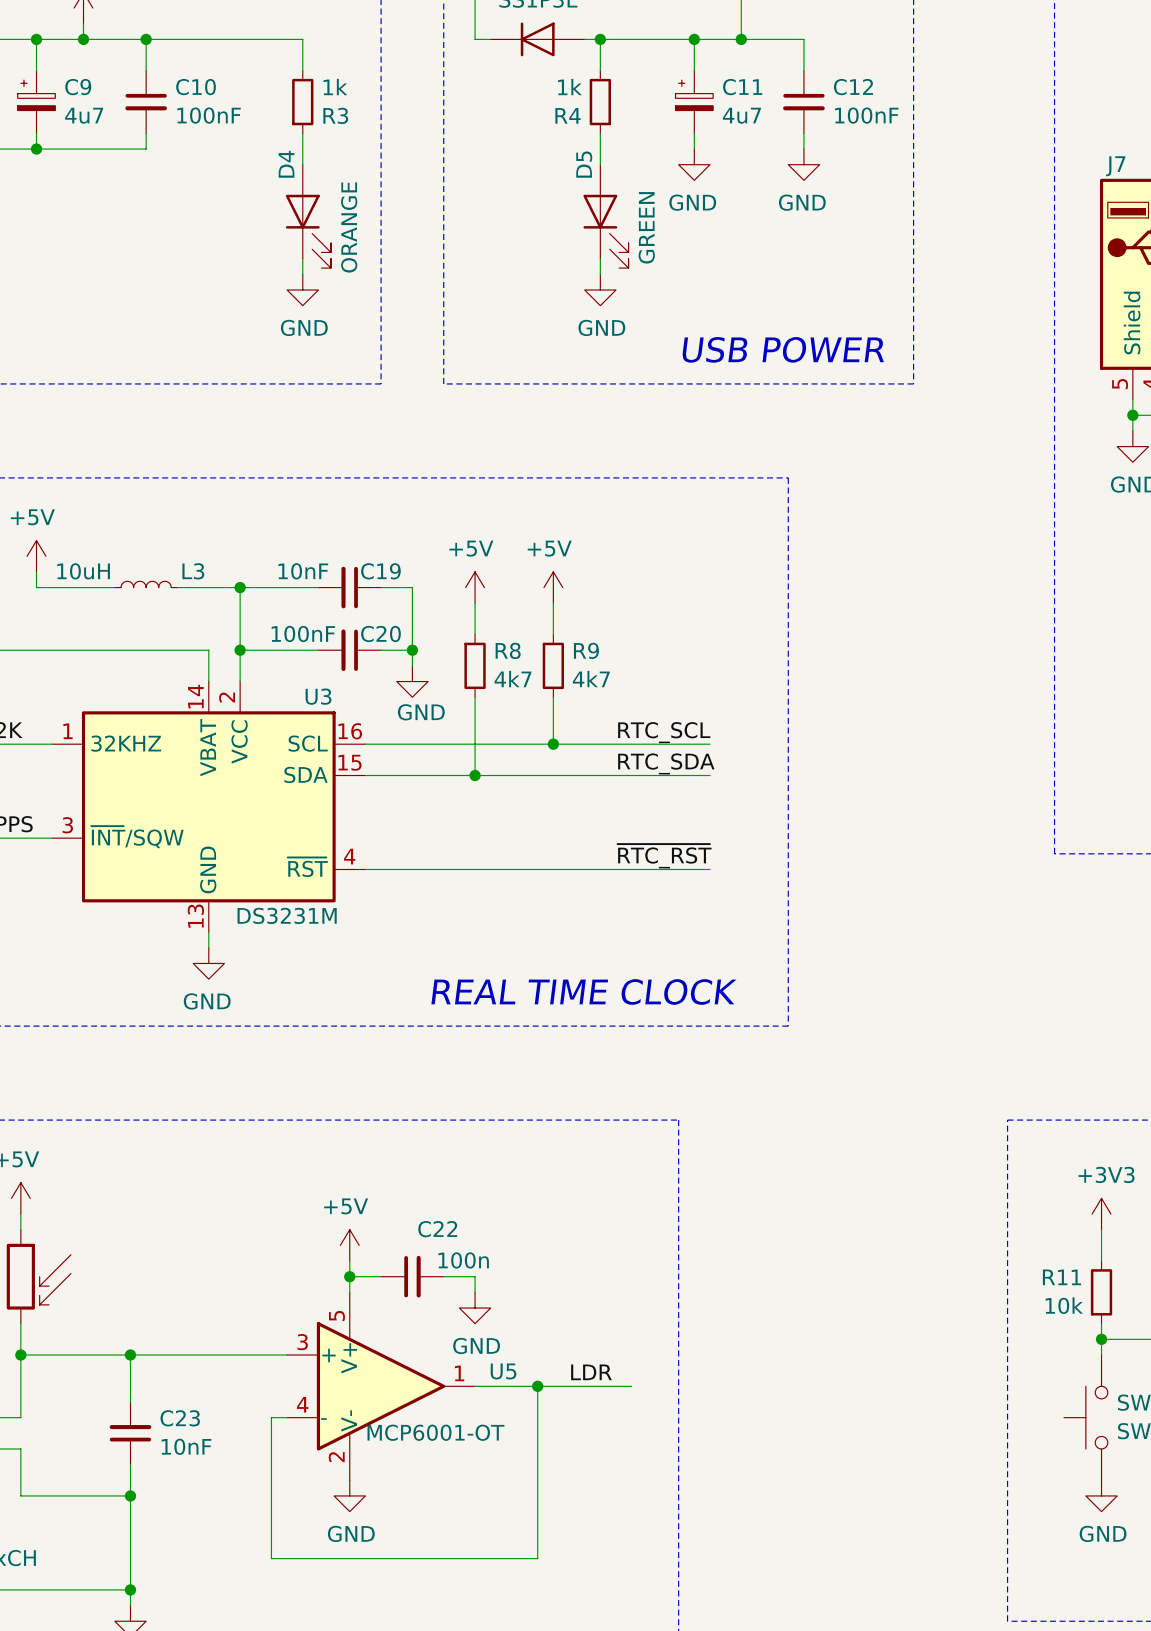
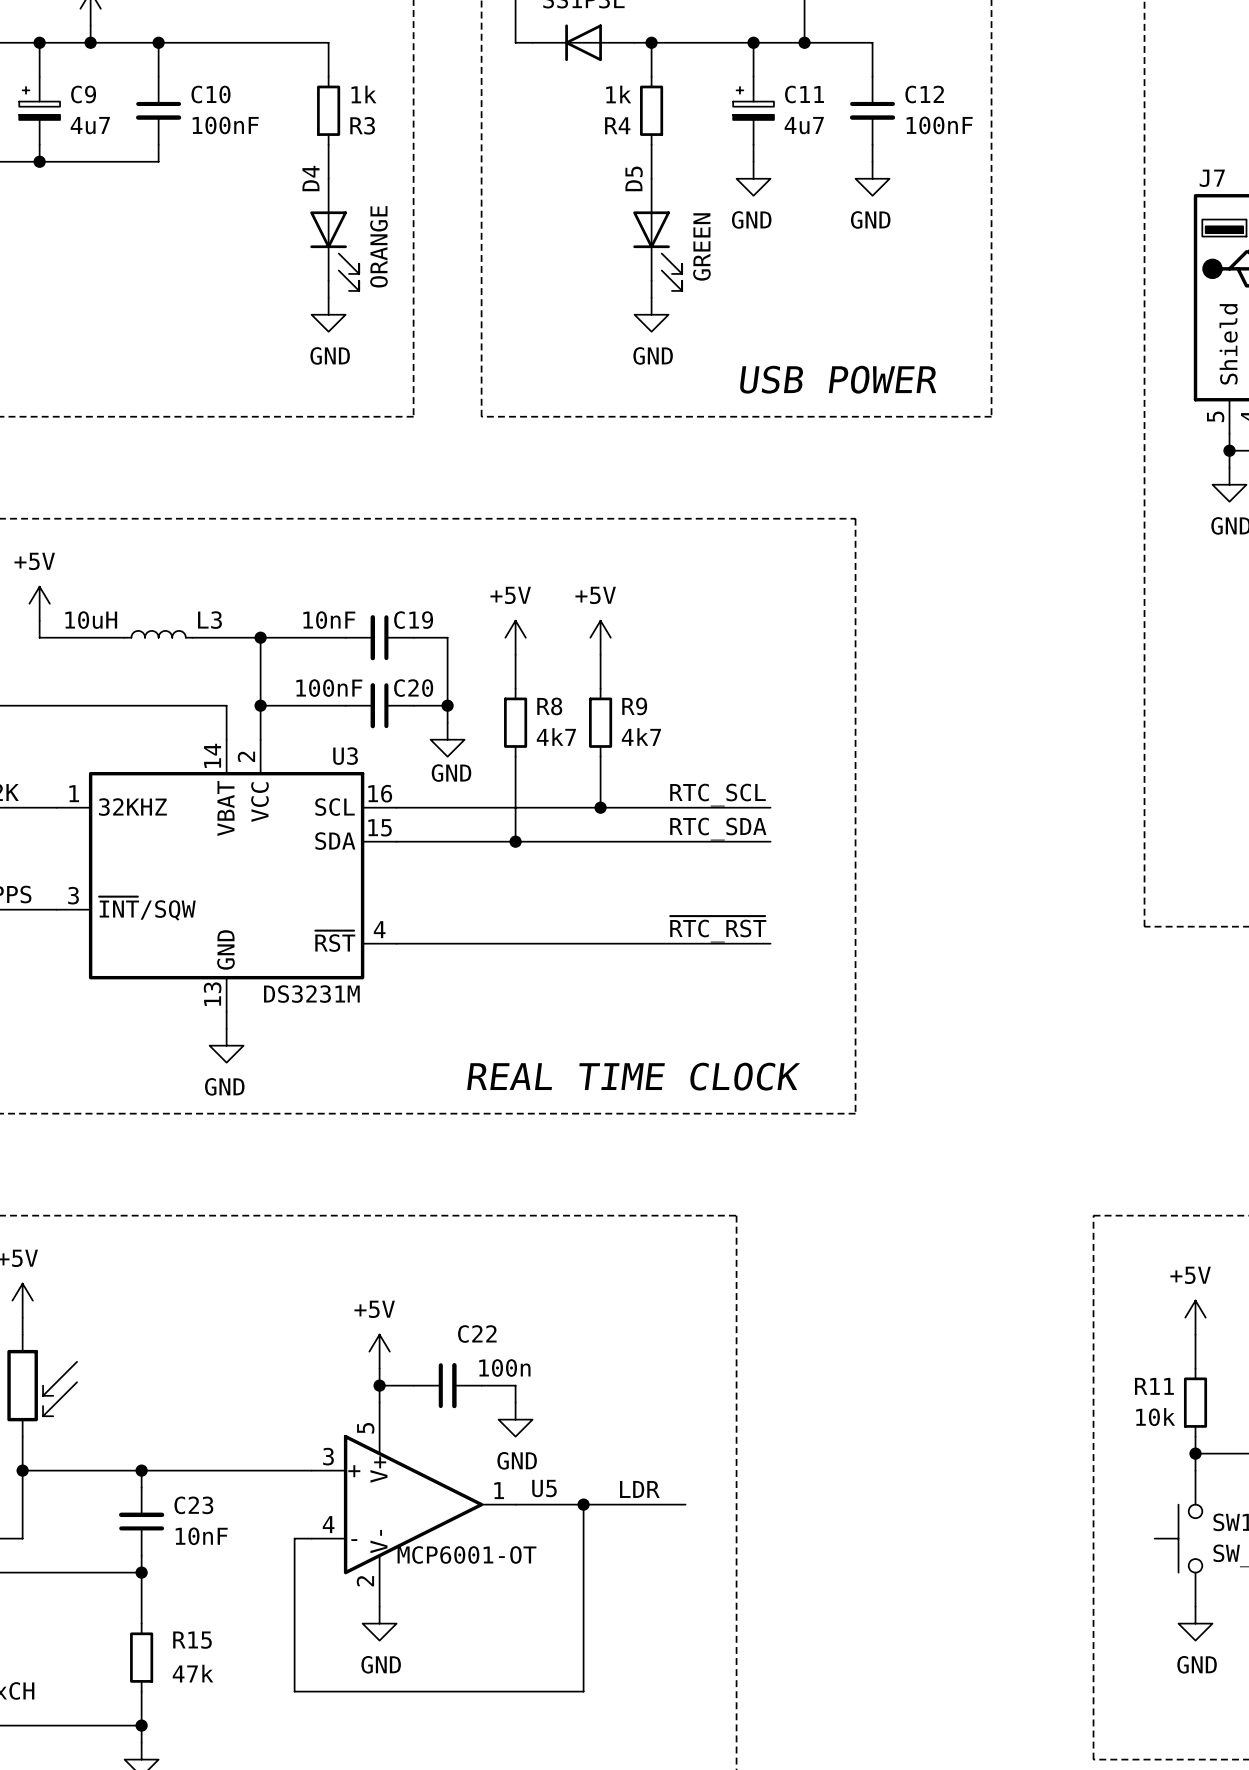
power symbol: +3V3 (1101, 1214) -> +5V (1195, 1317)
C23 position: (130, 1433) -> (141, 1521)
wire: (20, 1448) (20, 1495) (130, 1495) (130, 1558) -> (22, 1572) (141, 1572)
junction position: (130, 1495) -> (141, 1572)
R15: none -> 47k (141, 1657)

